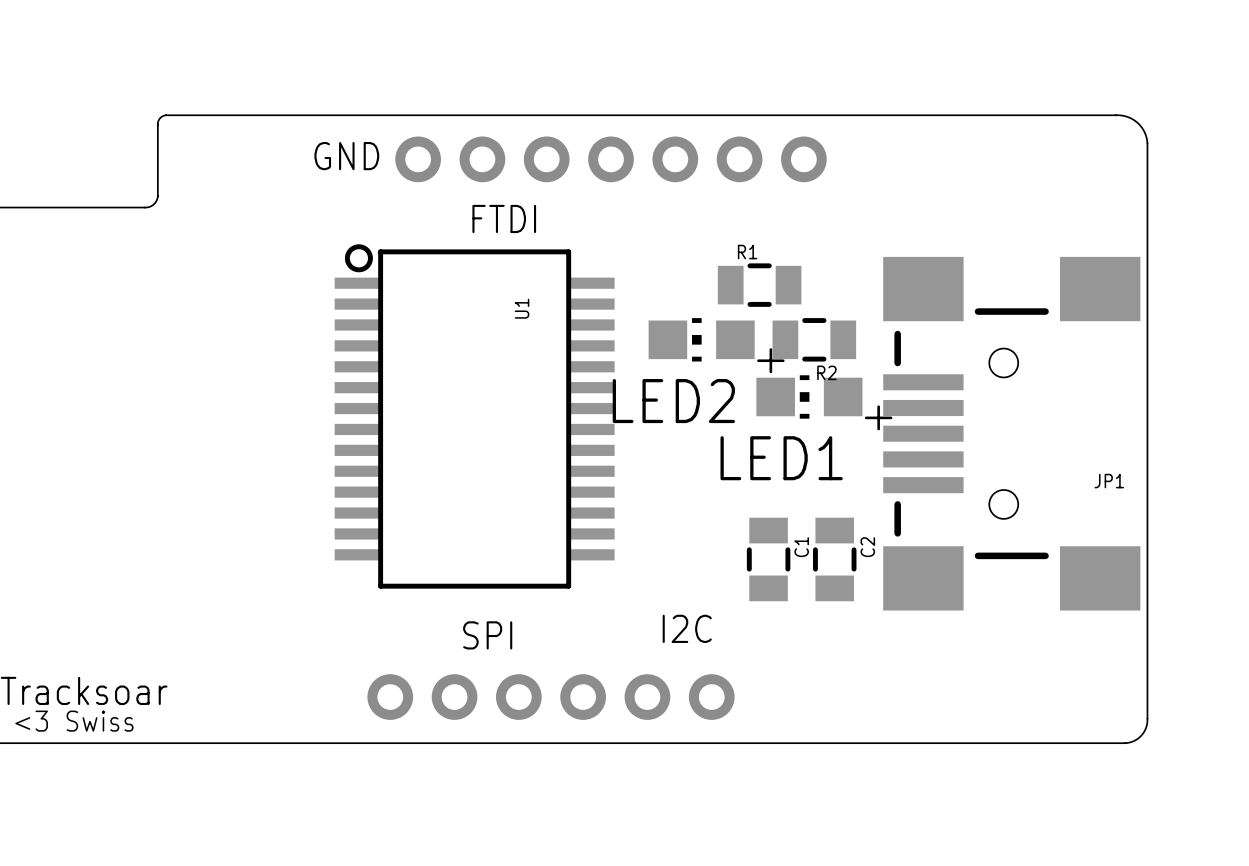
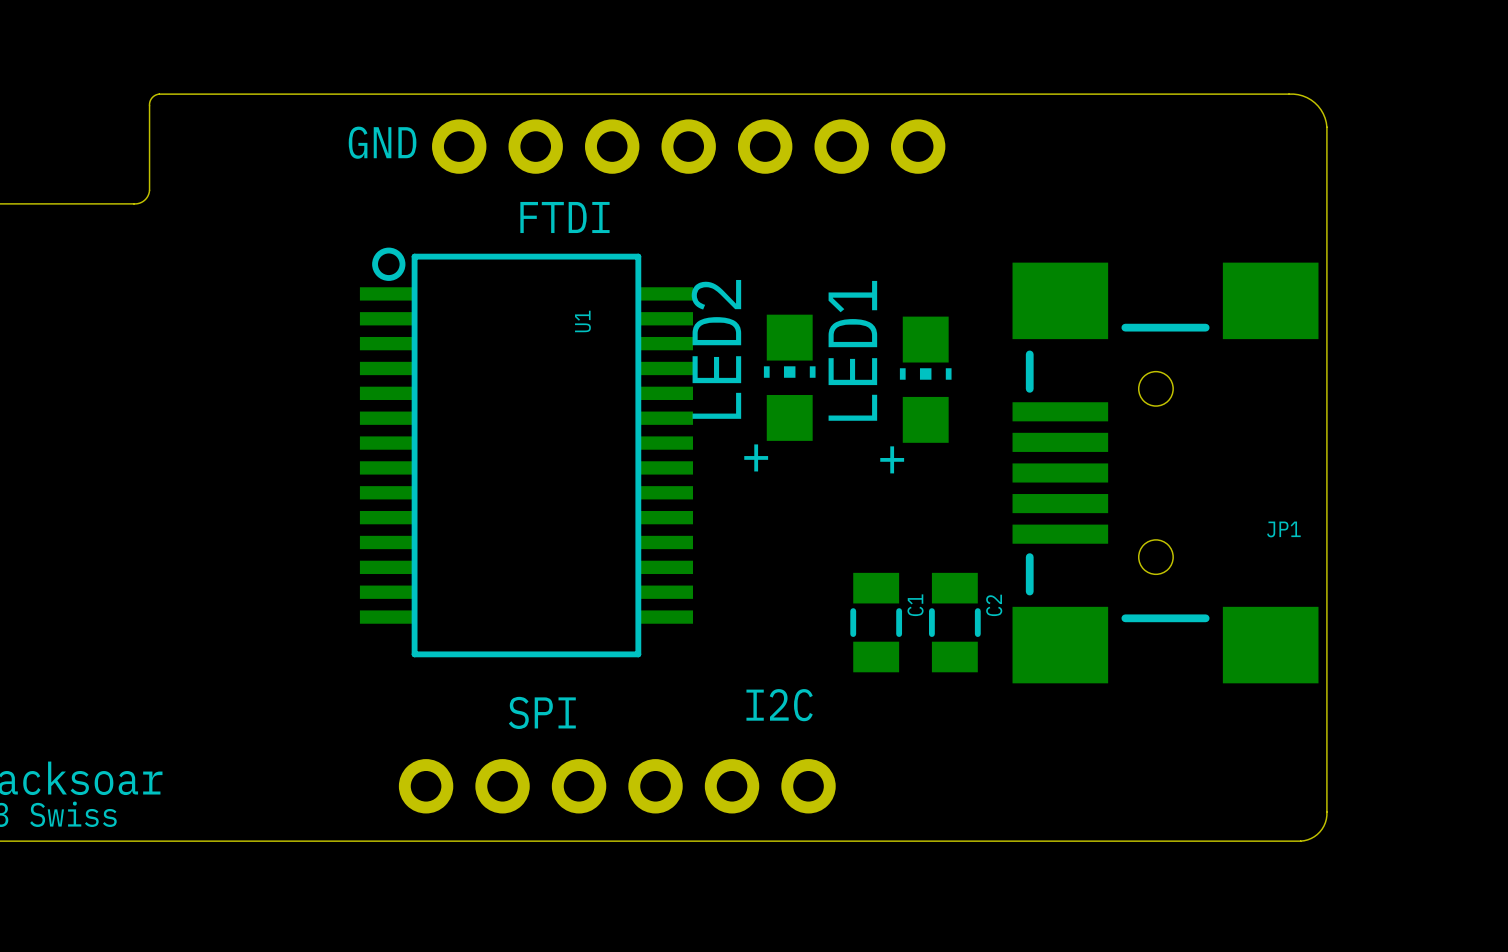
R1: (759, 285) -> none
LED2 rotation: 0° (701, 339) -> 90° clockwise (789, 377)
R2: (814, 339) -> none
LED1 rotation: 0° (809, 396) -> 90° clockwise (925, 379)

